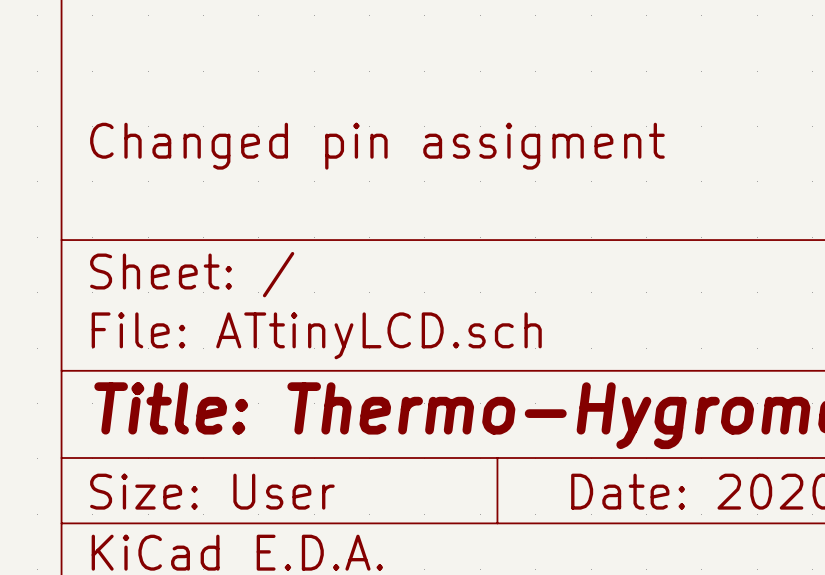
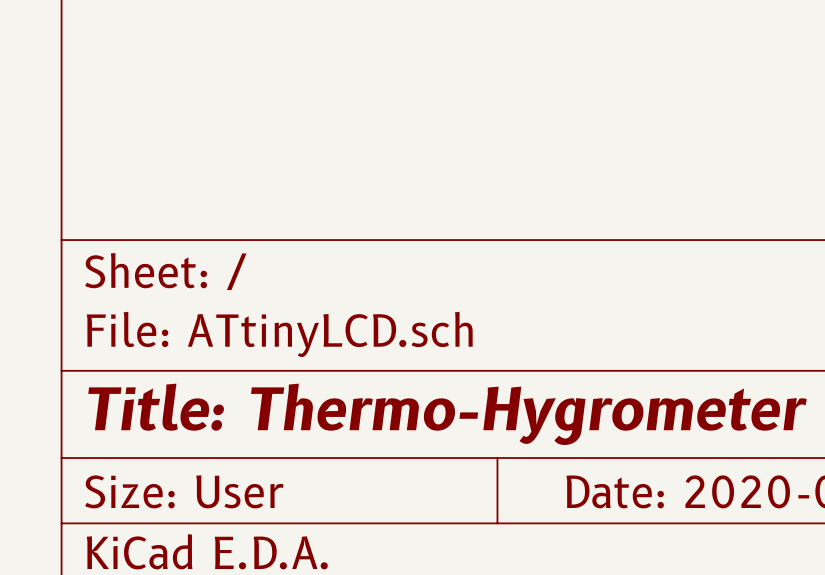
title block: Changed pin assigment (377, 146) -> none

